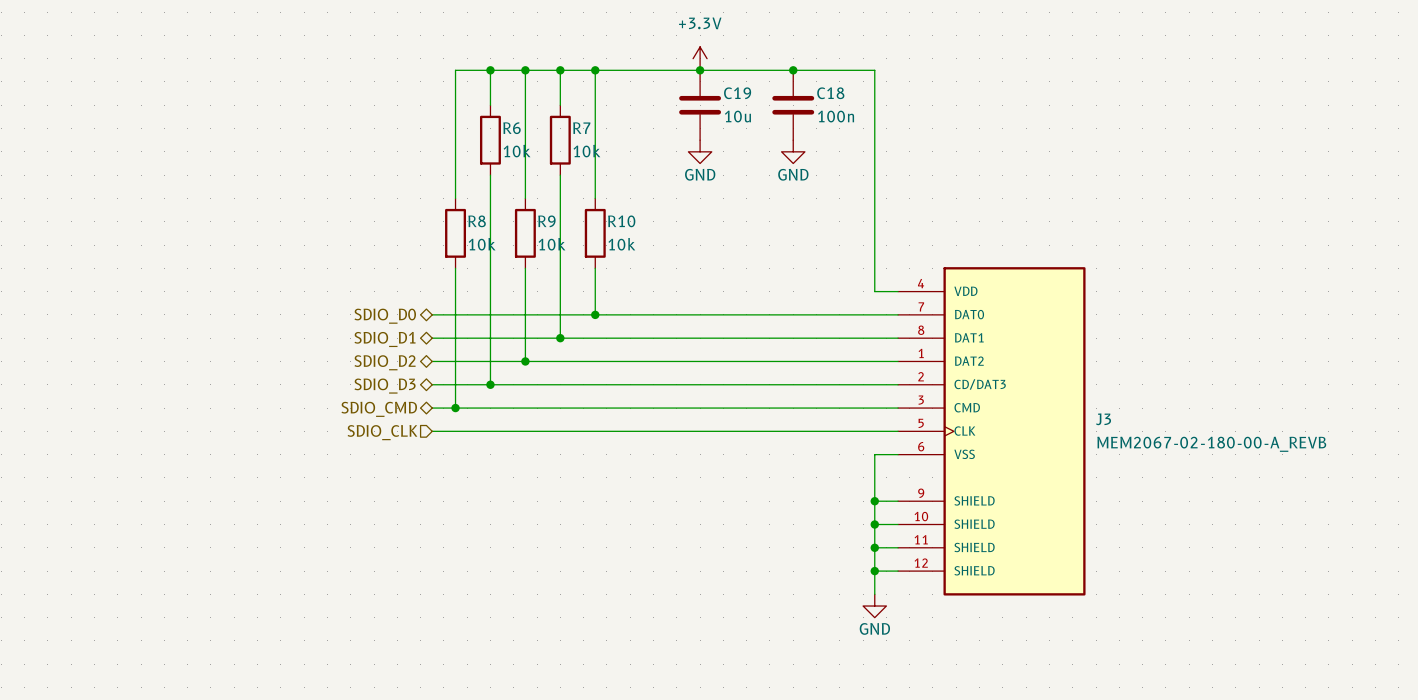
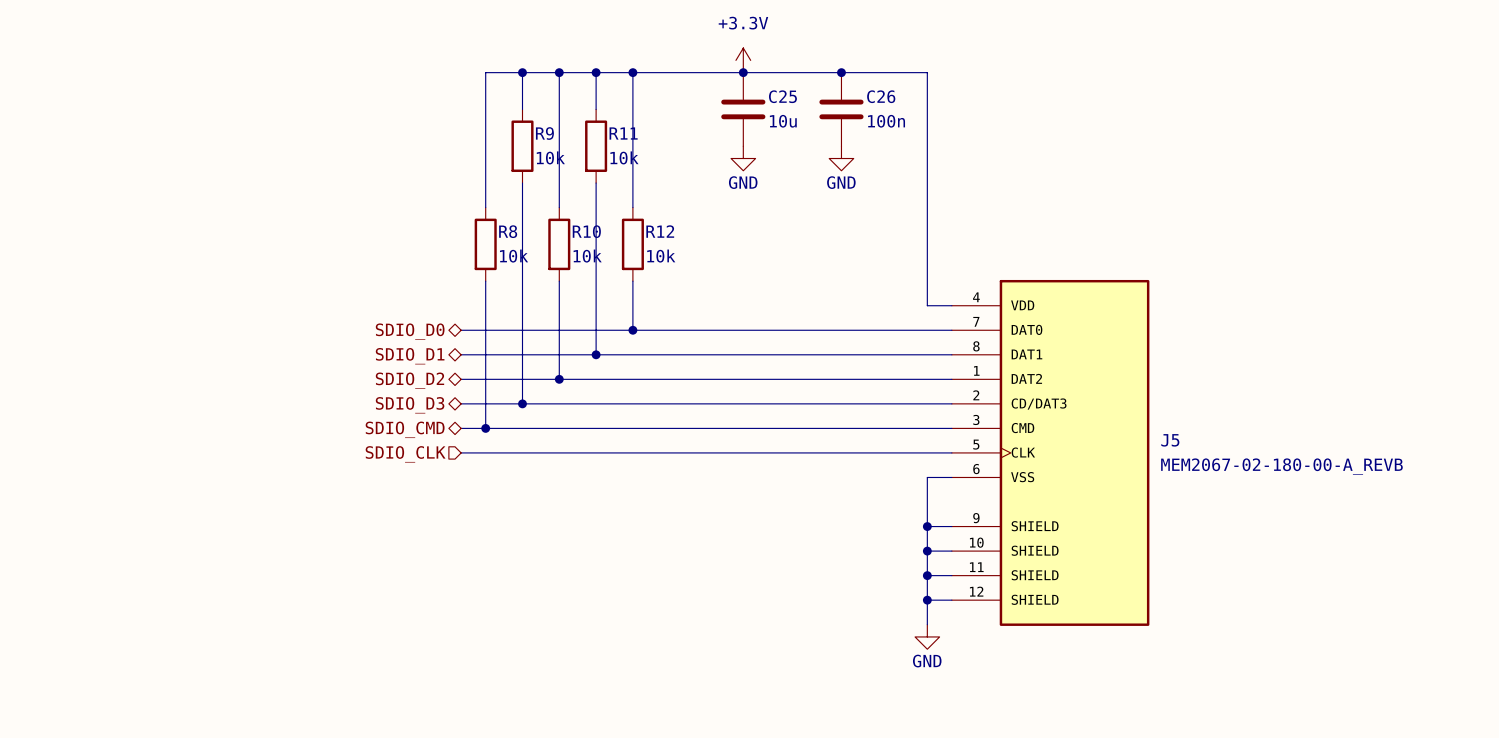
C19 name: C19 (737, 93) -> C25 (782, 96)
C18 name: C18 (830, 93) -> C26 (881, 96)
R6 name: R6 (512, 128) -> R9 (544, 133)
R7 name: R7 (581, 128) -> R11 (623, 133)
R9 name: R9 (546, 221) -> R10 (586, 231)
R10 name: R10 (621, 221) -> R12 (660, 231)
J3 name: J3 (1103, 419) -> J5 (1170, 440)

